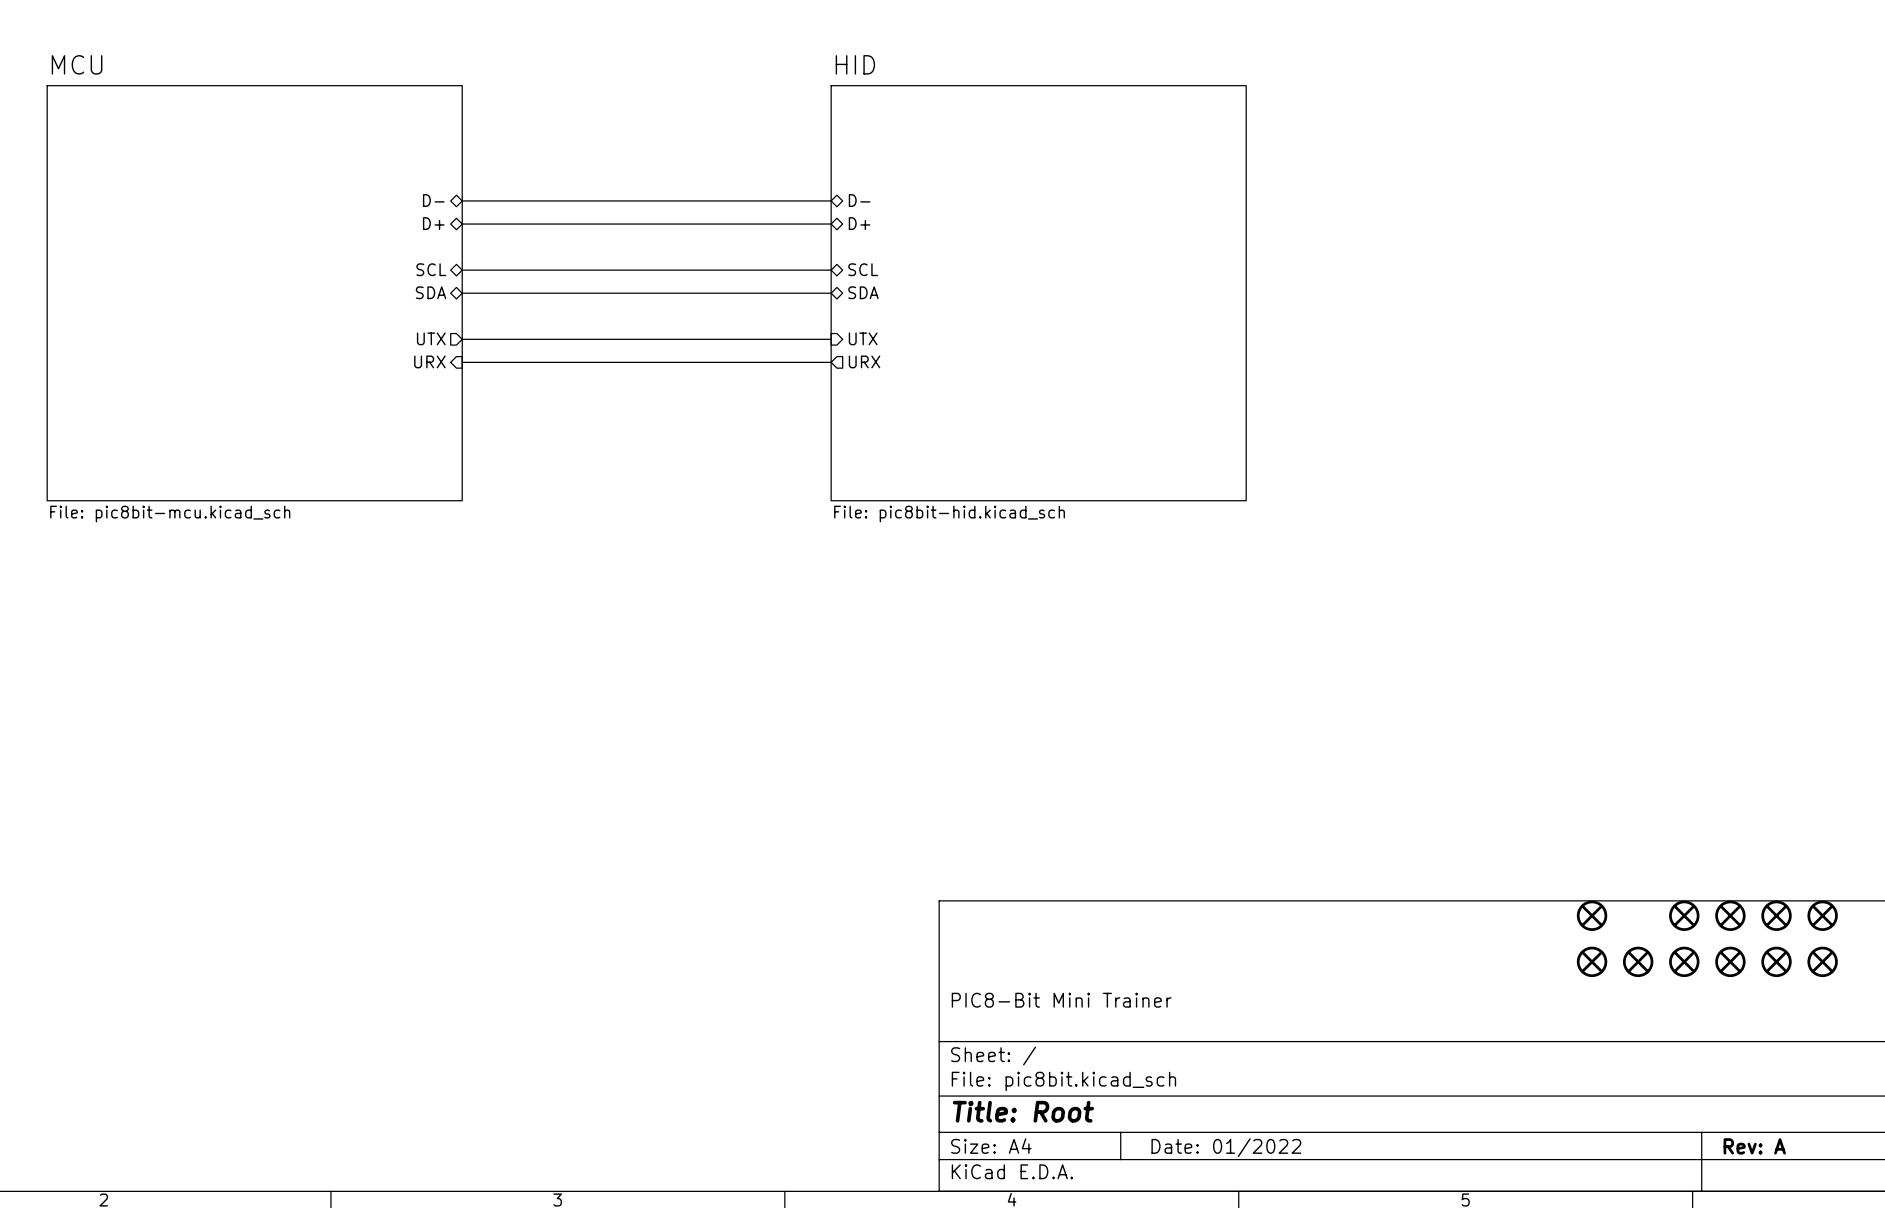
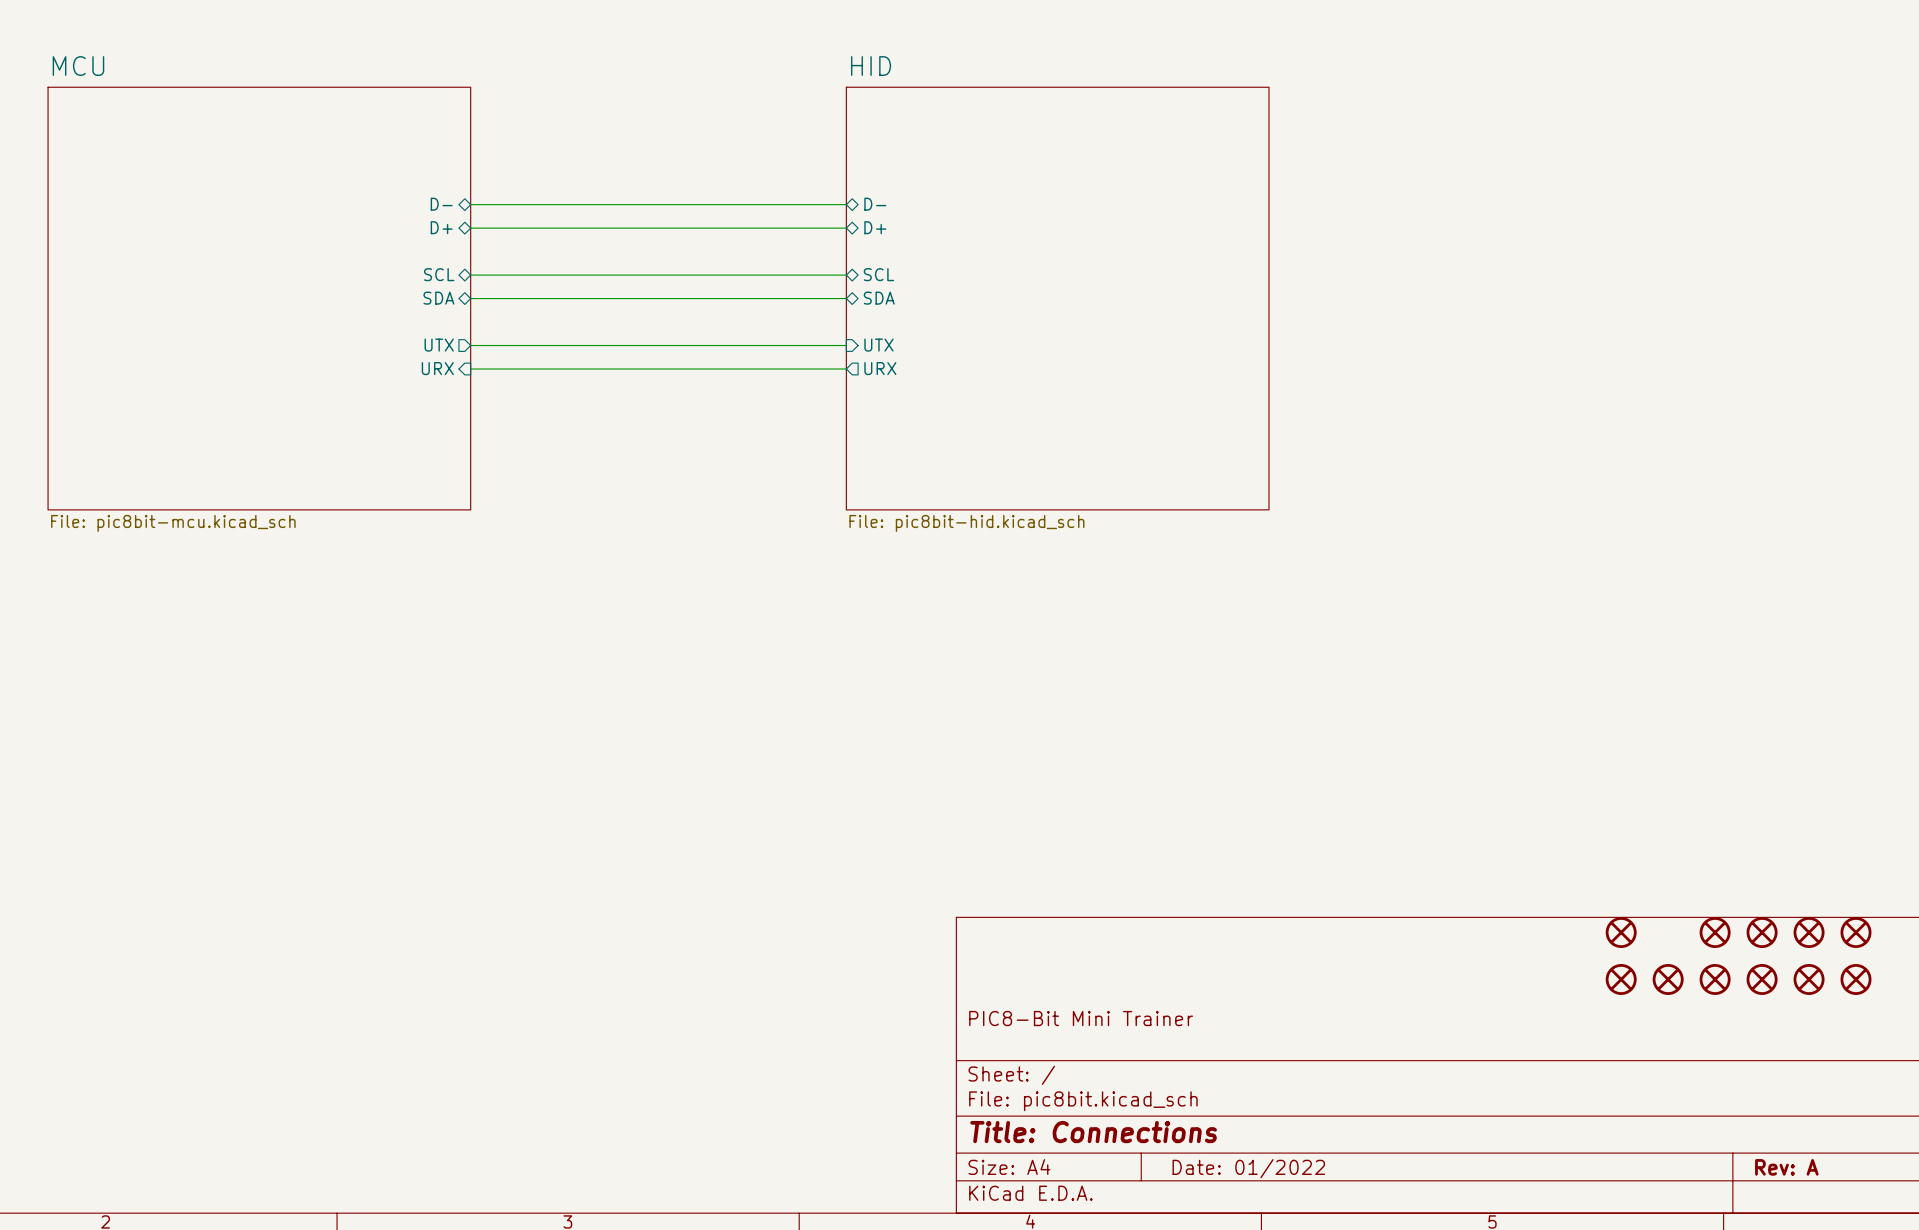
title block: Title: Root (1023, 1111) -> Title: Connections (1093, 1132)

